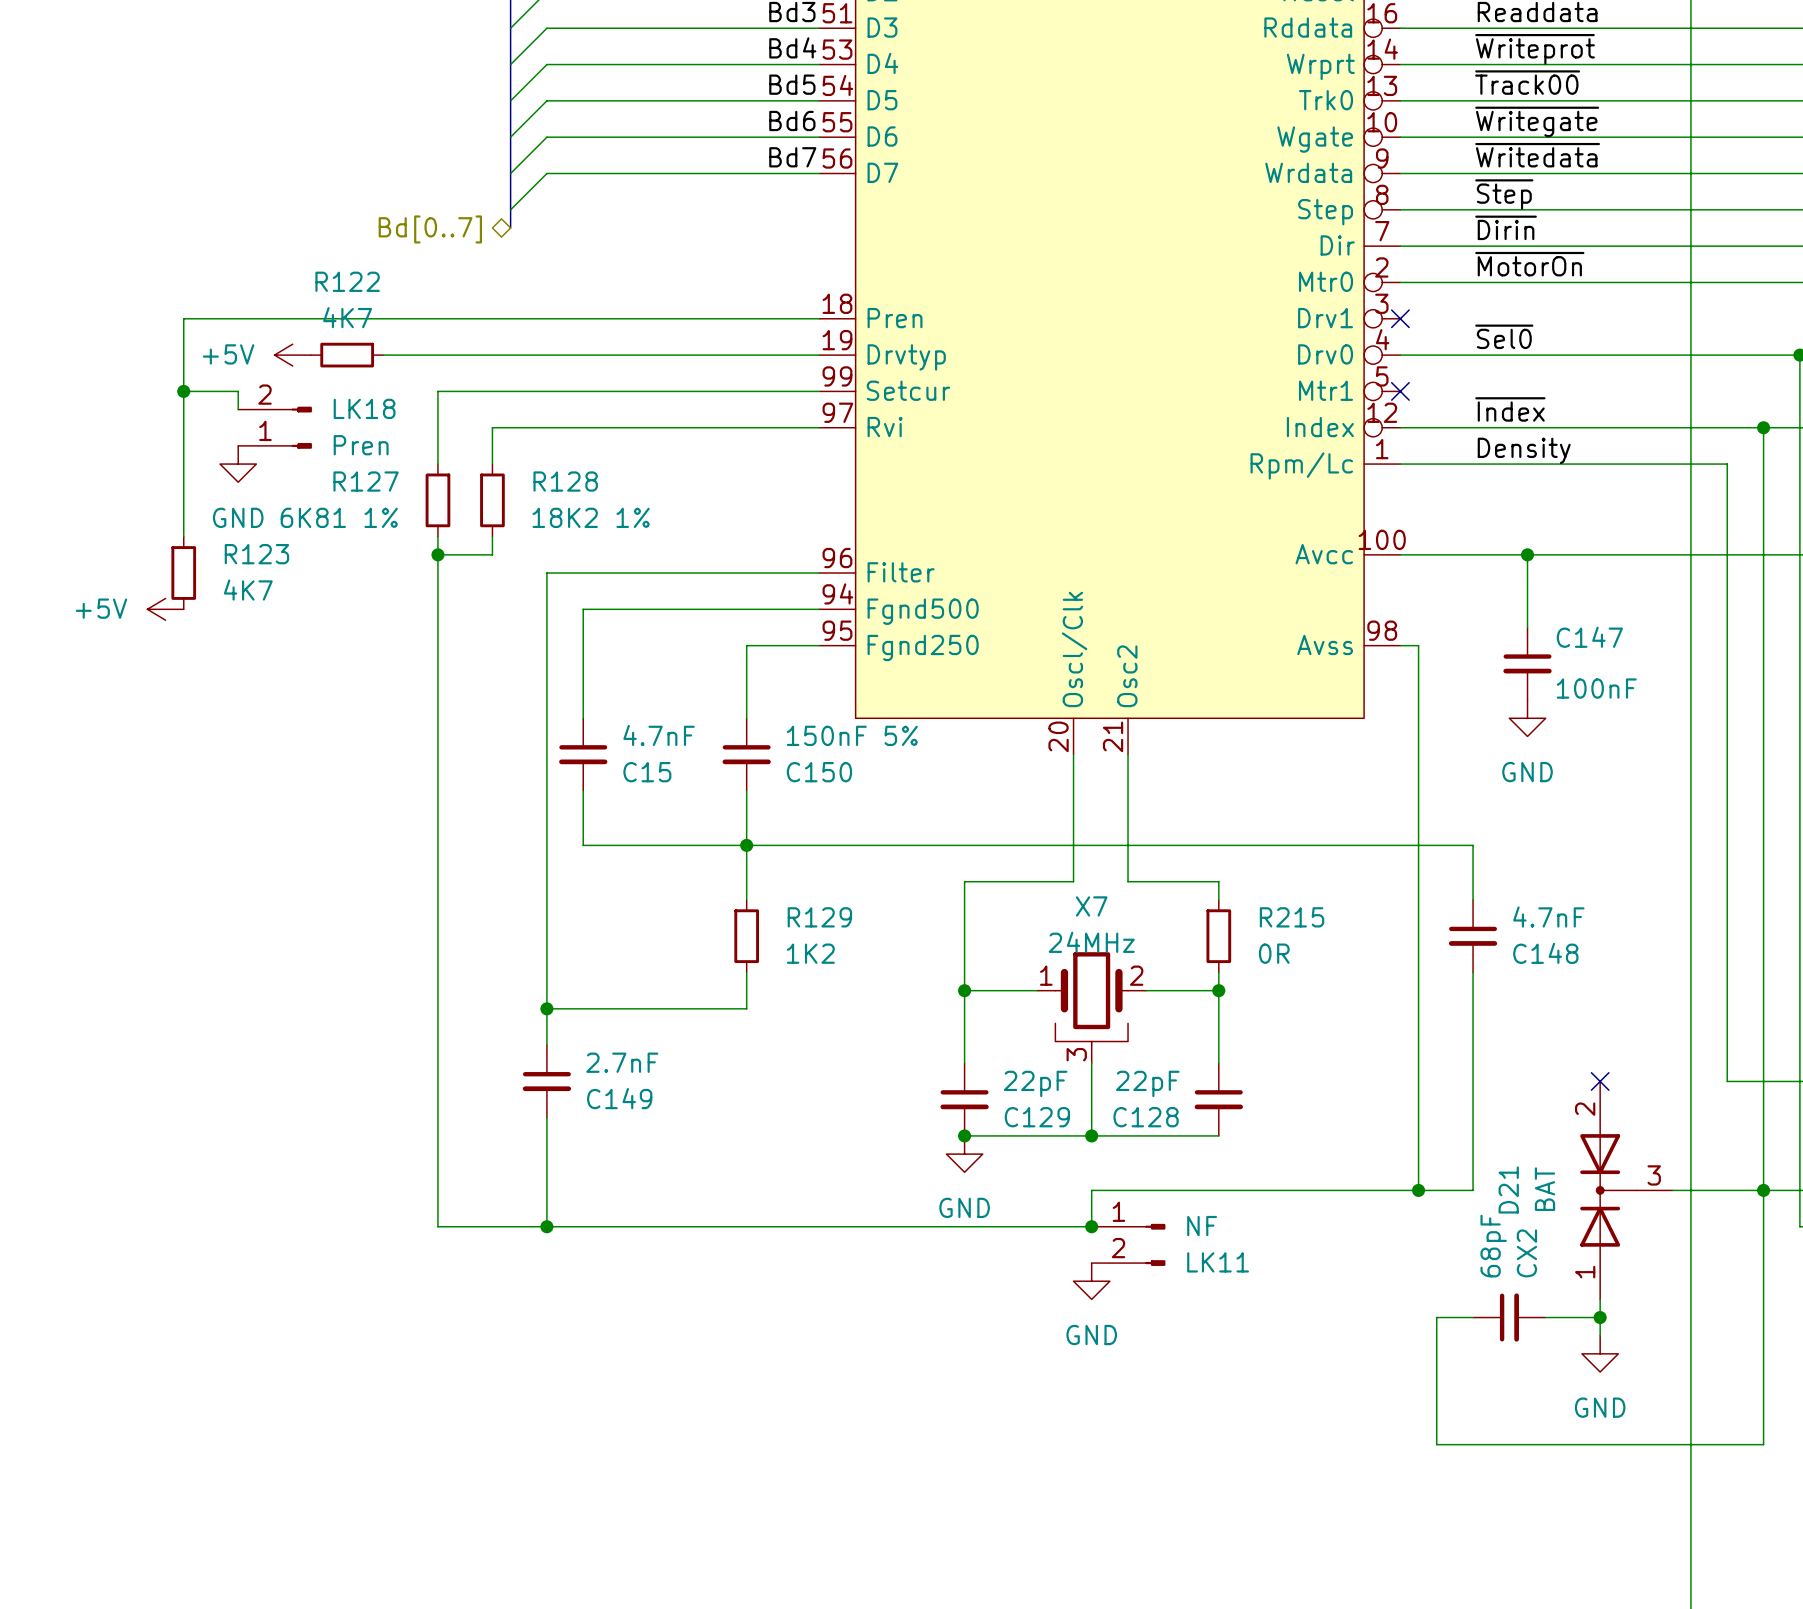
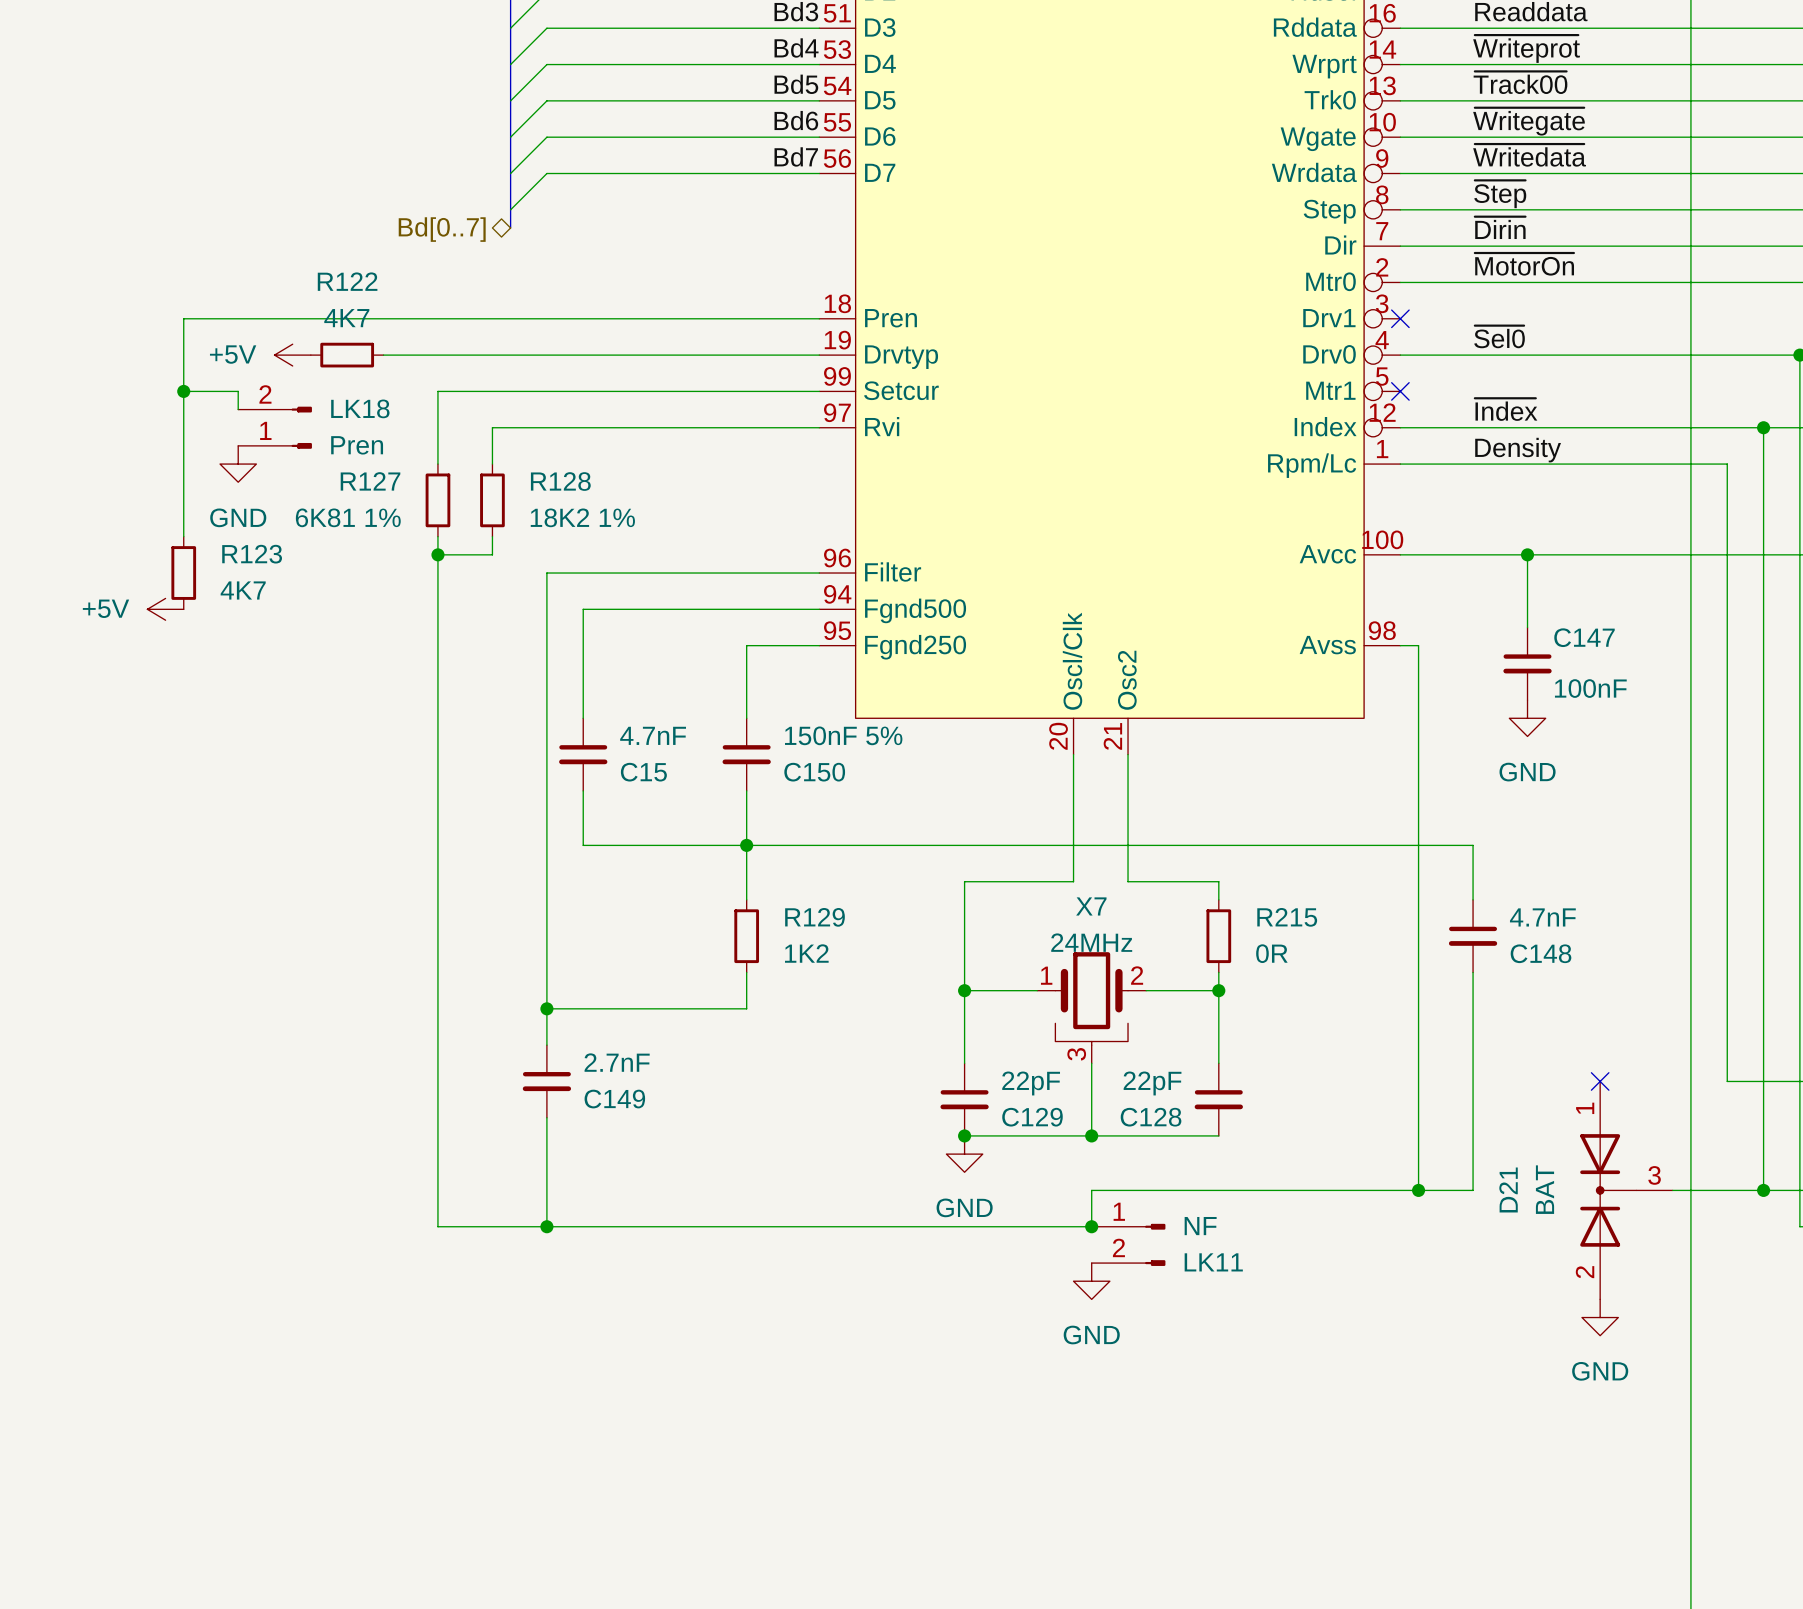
D21 flip: as is (1608, 1190) -> up-down (1608, 1190)
wire: (1763, 1190) (1763, 1444) (1436, 1444) (1436, 1317) (1473, 1317) -> none
CX2: 68pF (1509, 1317) -> none
wire: (1545, 1317) (1600, 1317) -> none
junction: (1600, 1317) -> none
power symbol position: GND (1600, 1353) -> GND (1600, 1317)

